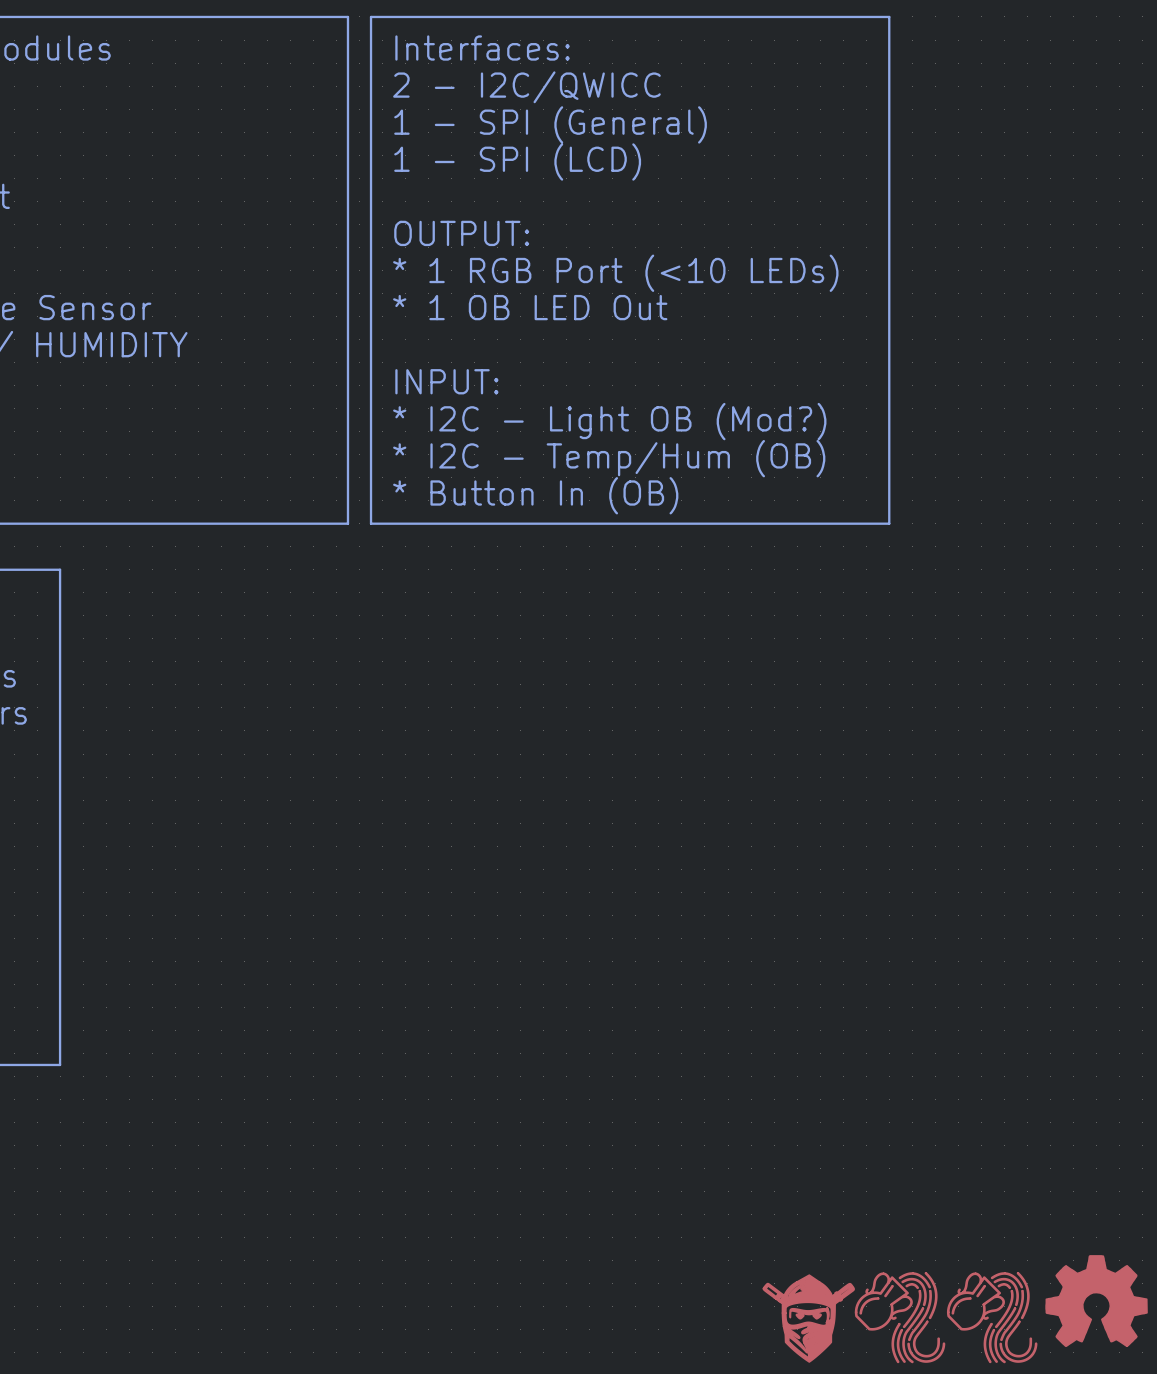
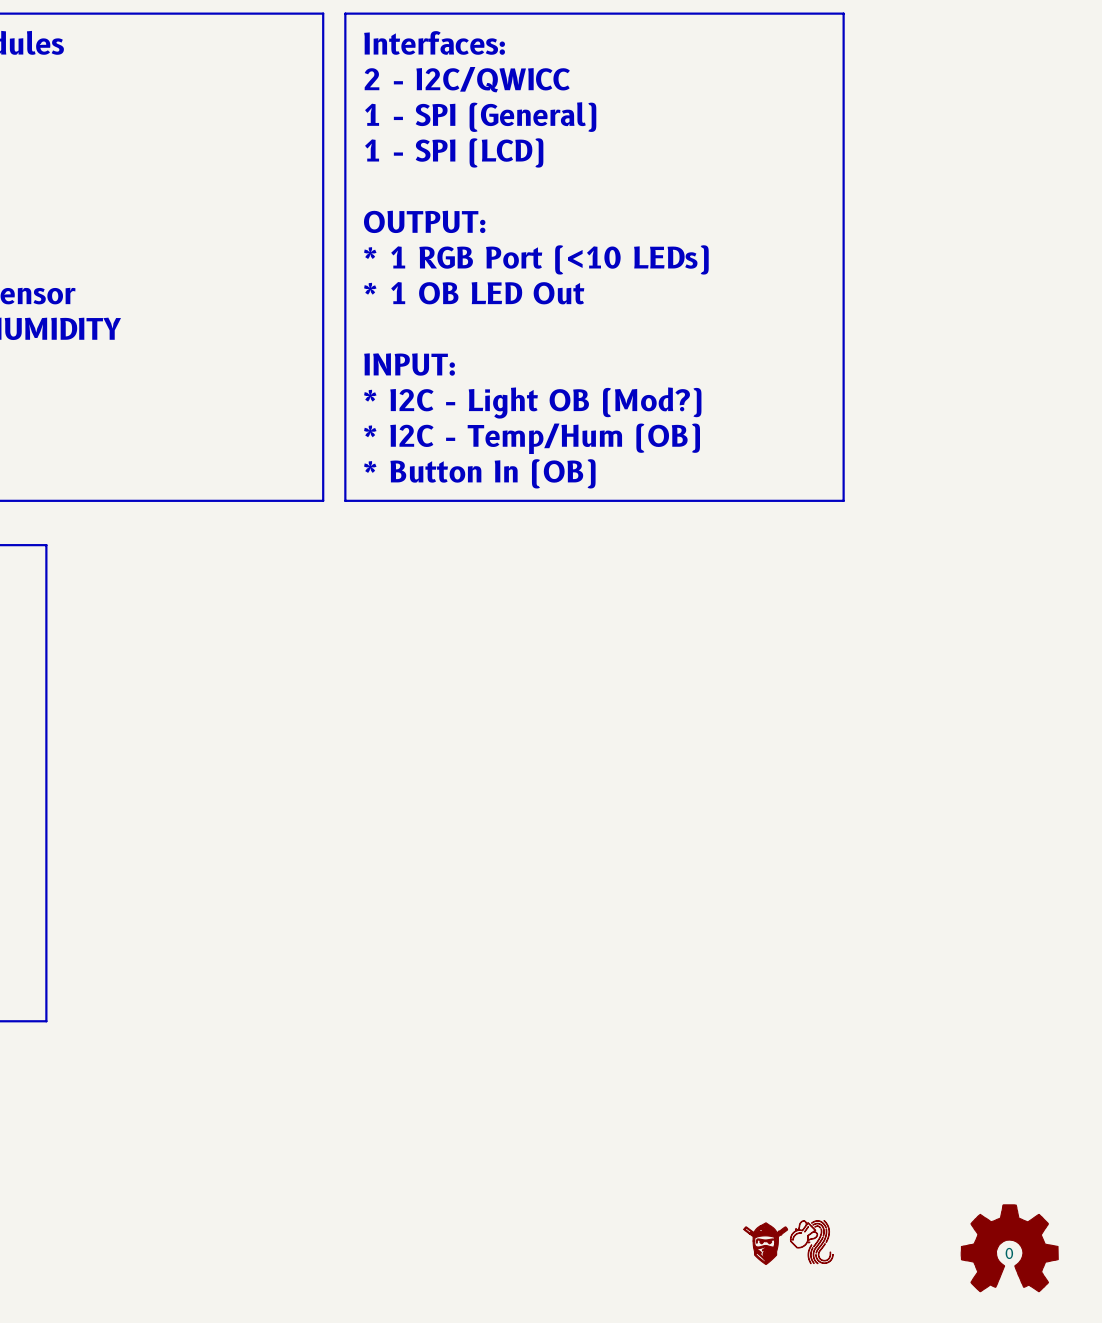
part: none -> (811, 1242)
part: none -> (765, 1243)
part: none -> (1009, 1248)
part: (1096, 1301) -> none
part: (900, 1317) -> none
part: (992, 1317) -> none
part: (808, 1318) -> none

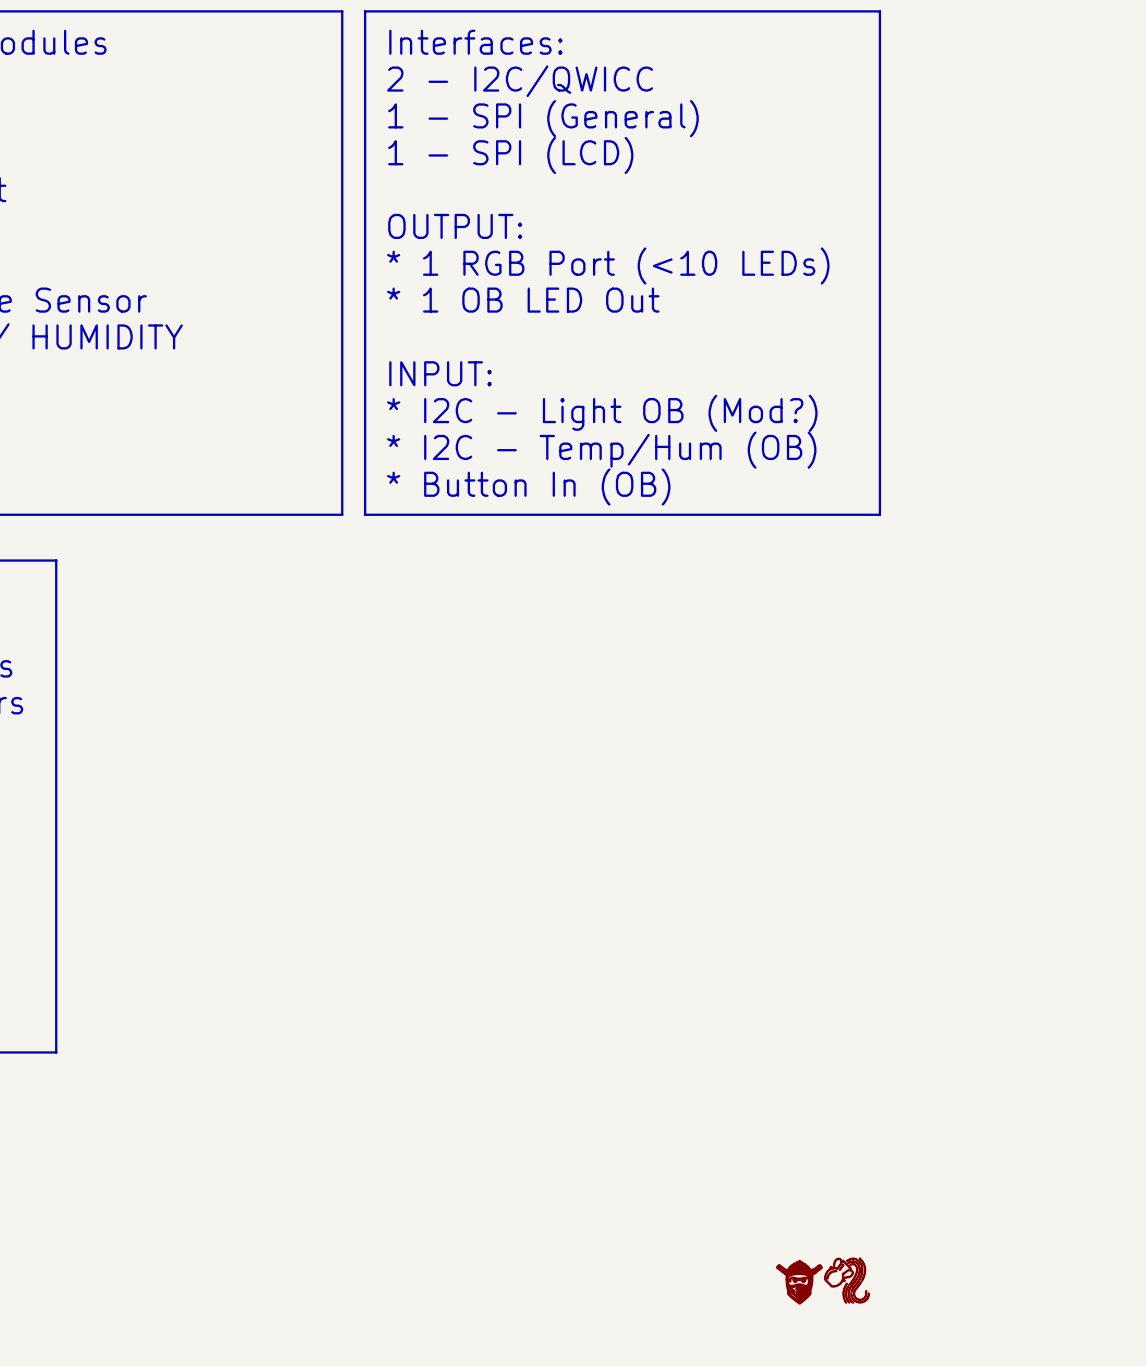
part: (1009, 1248) -> none

